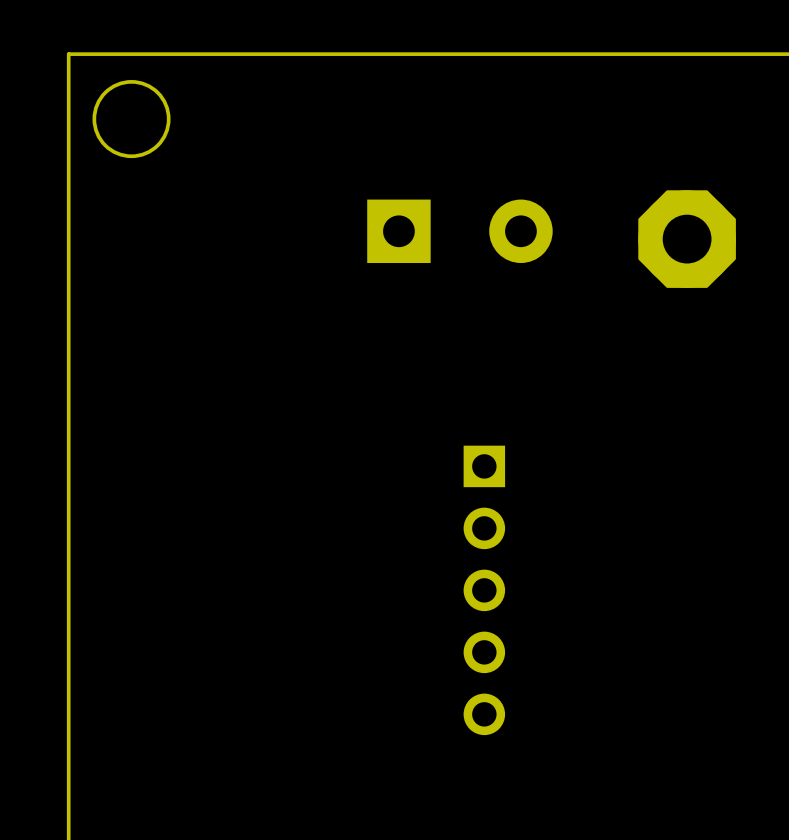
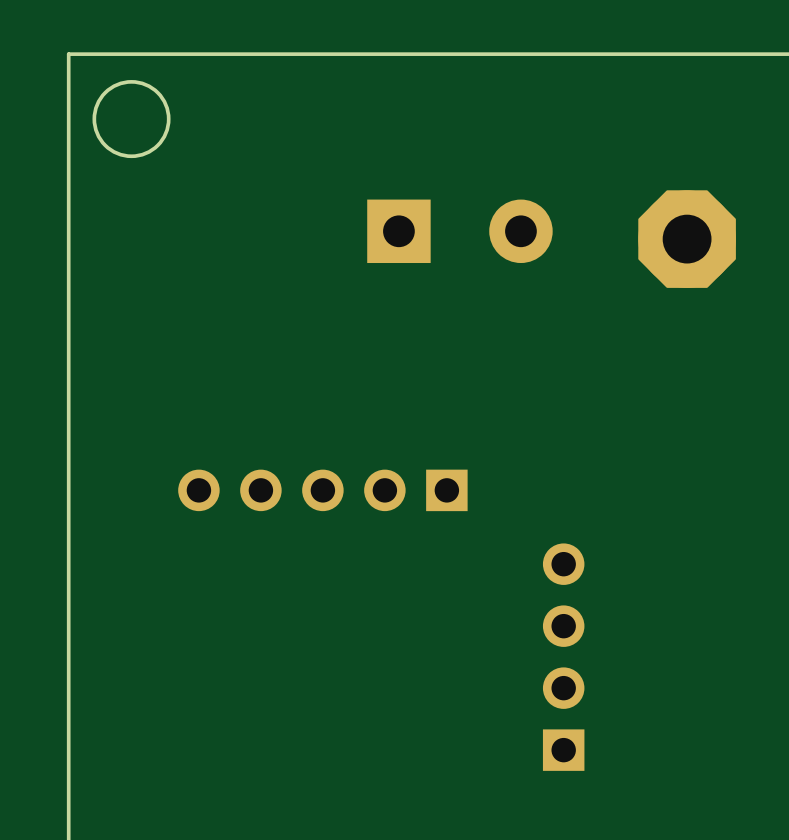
part rotation: 0° (484, 590) -> 90° clockwise (322, 490)
part position: (484, 590) -> (322, 490)
part: none -> (563, 657)

